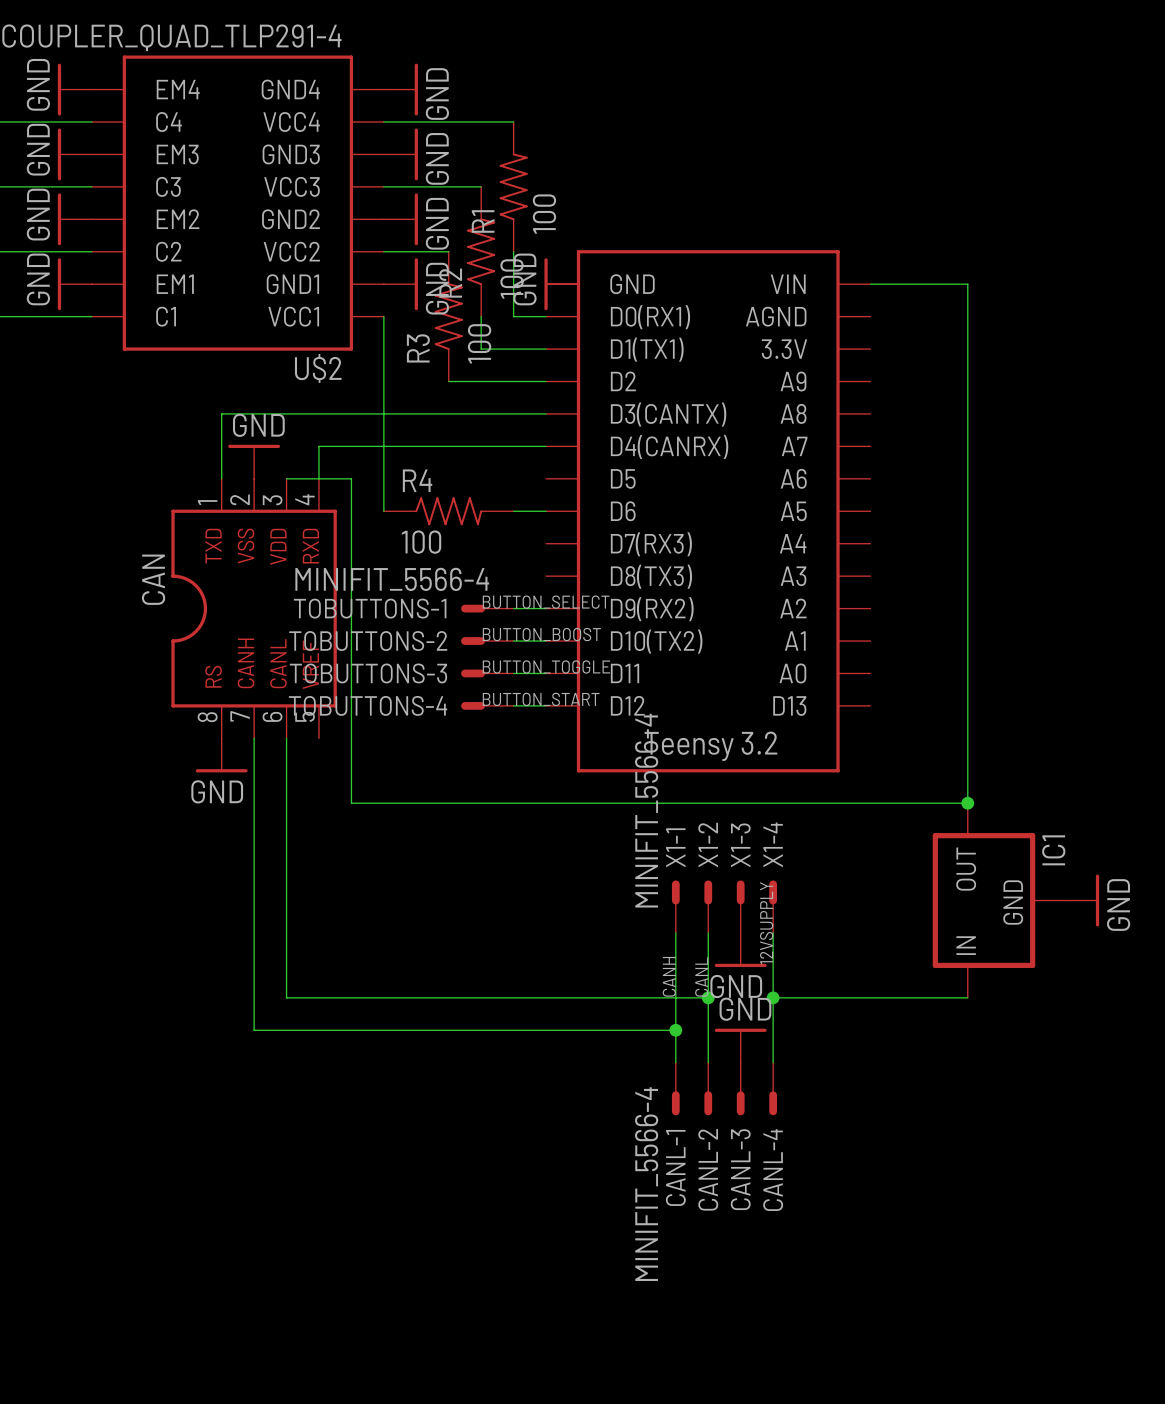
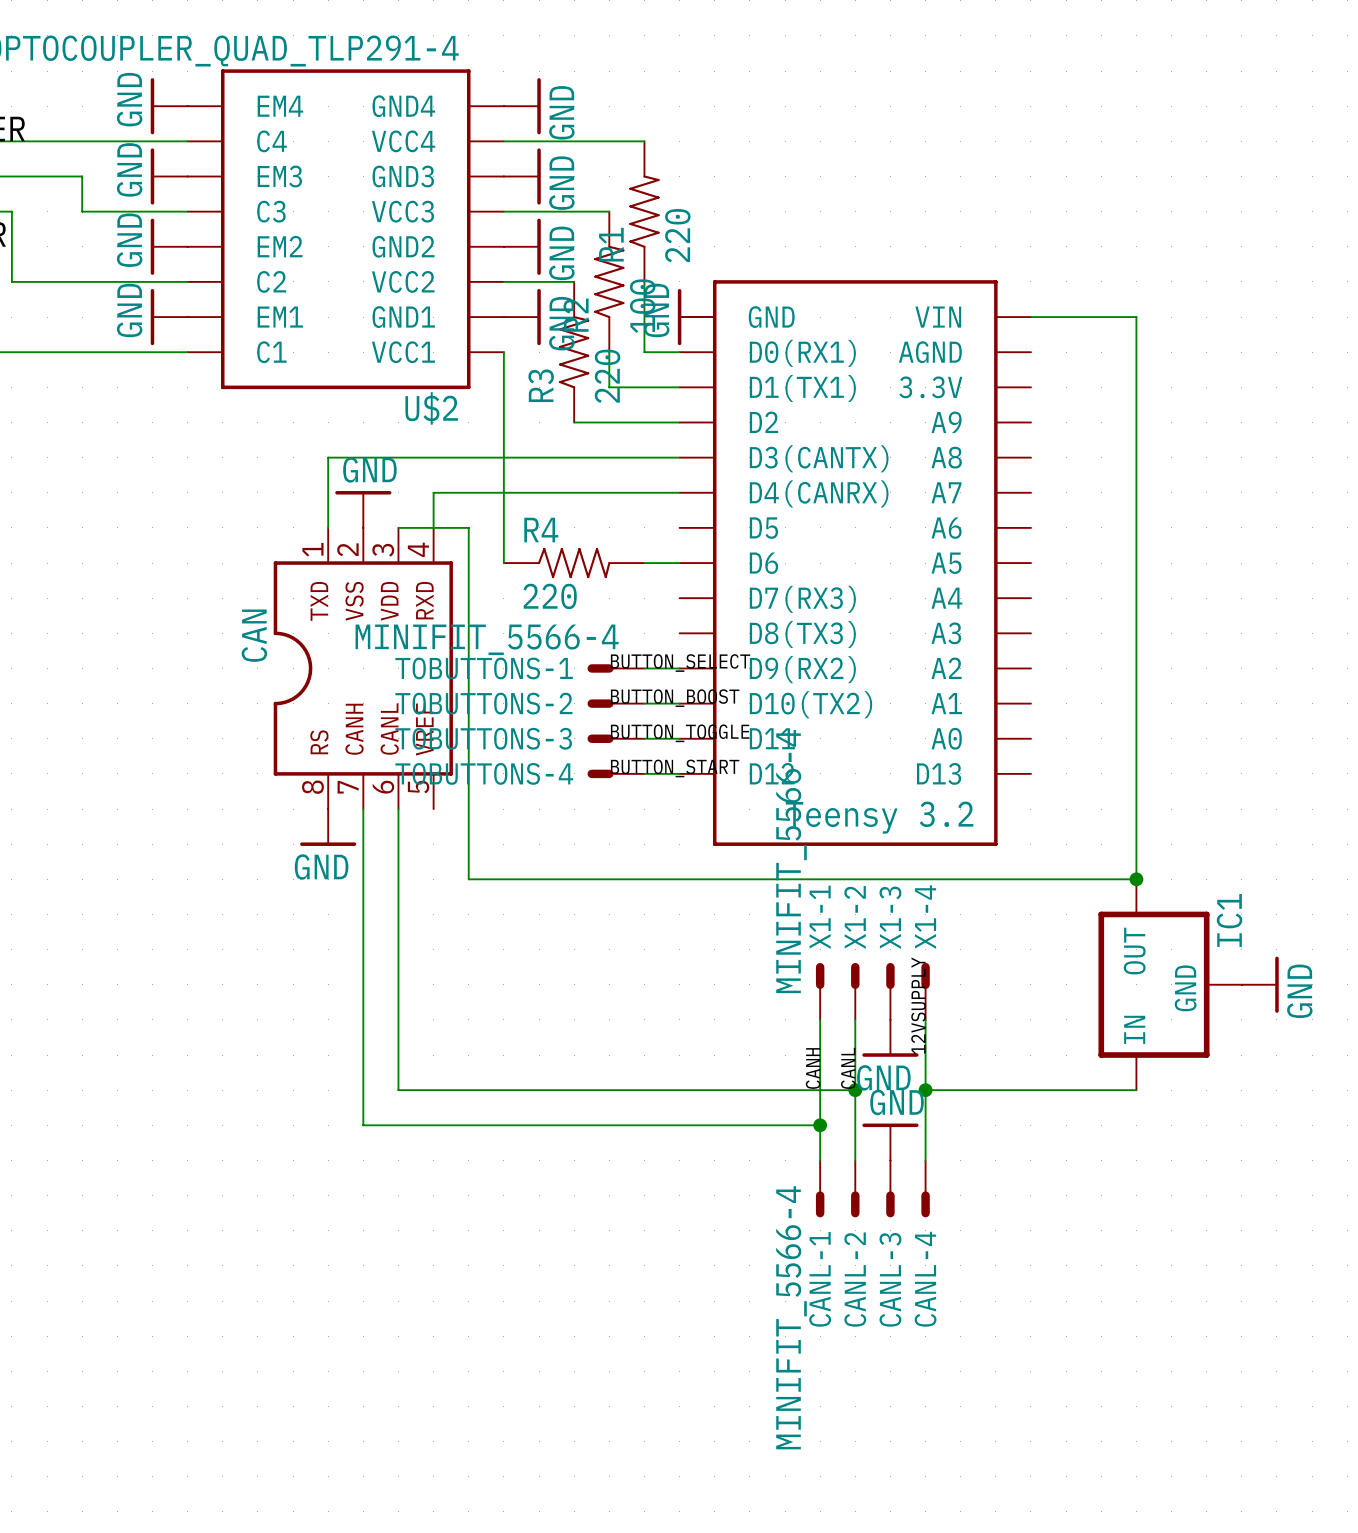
R1 value: 100 (544, 214) -> 220 (677, 235)
R3 value: 100 (479, 343) -> 220 (607, 376)
R4 value: 100 (421, 542) -> 220 (550, 596)

